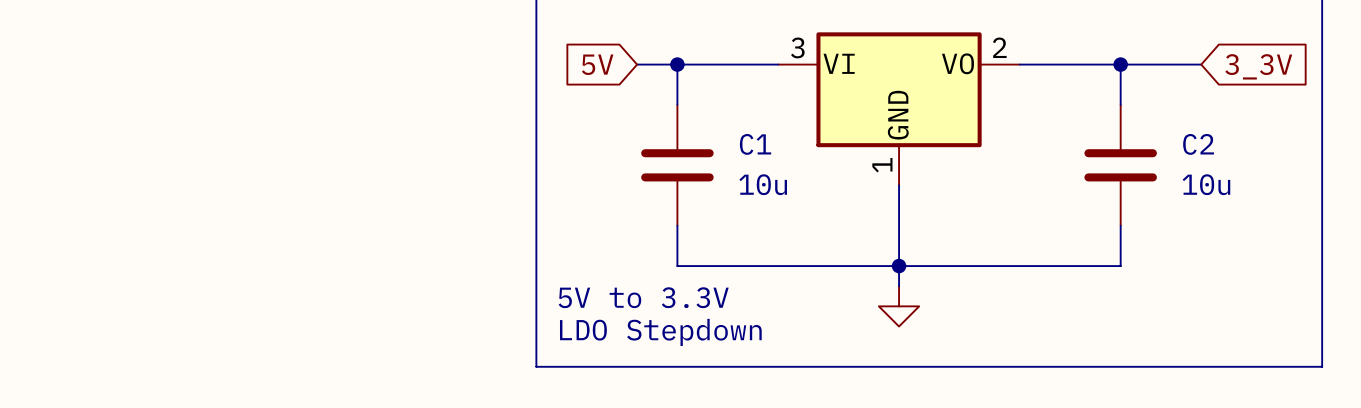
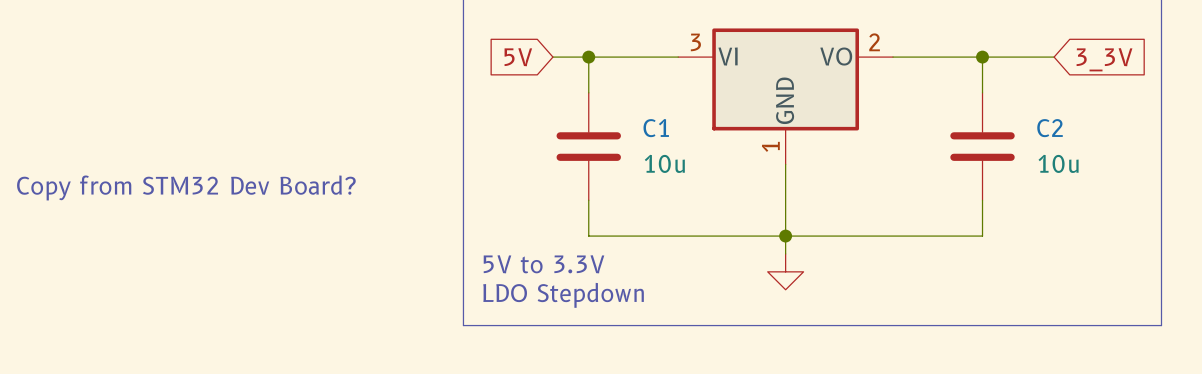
text: none -> Copy from STM32 Dev Board? (186, 187)

